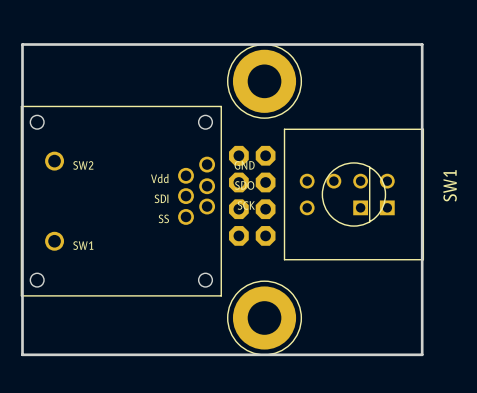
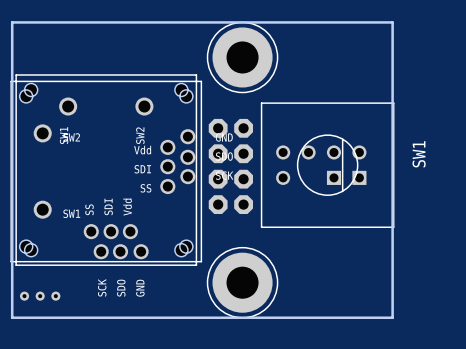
part: none -> (106, 170)
part: none -> (40, 296)

